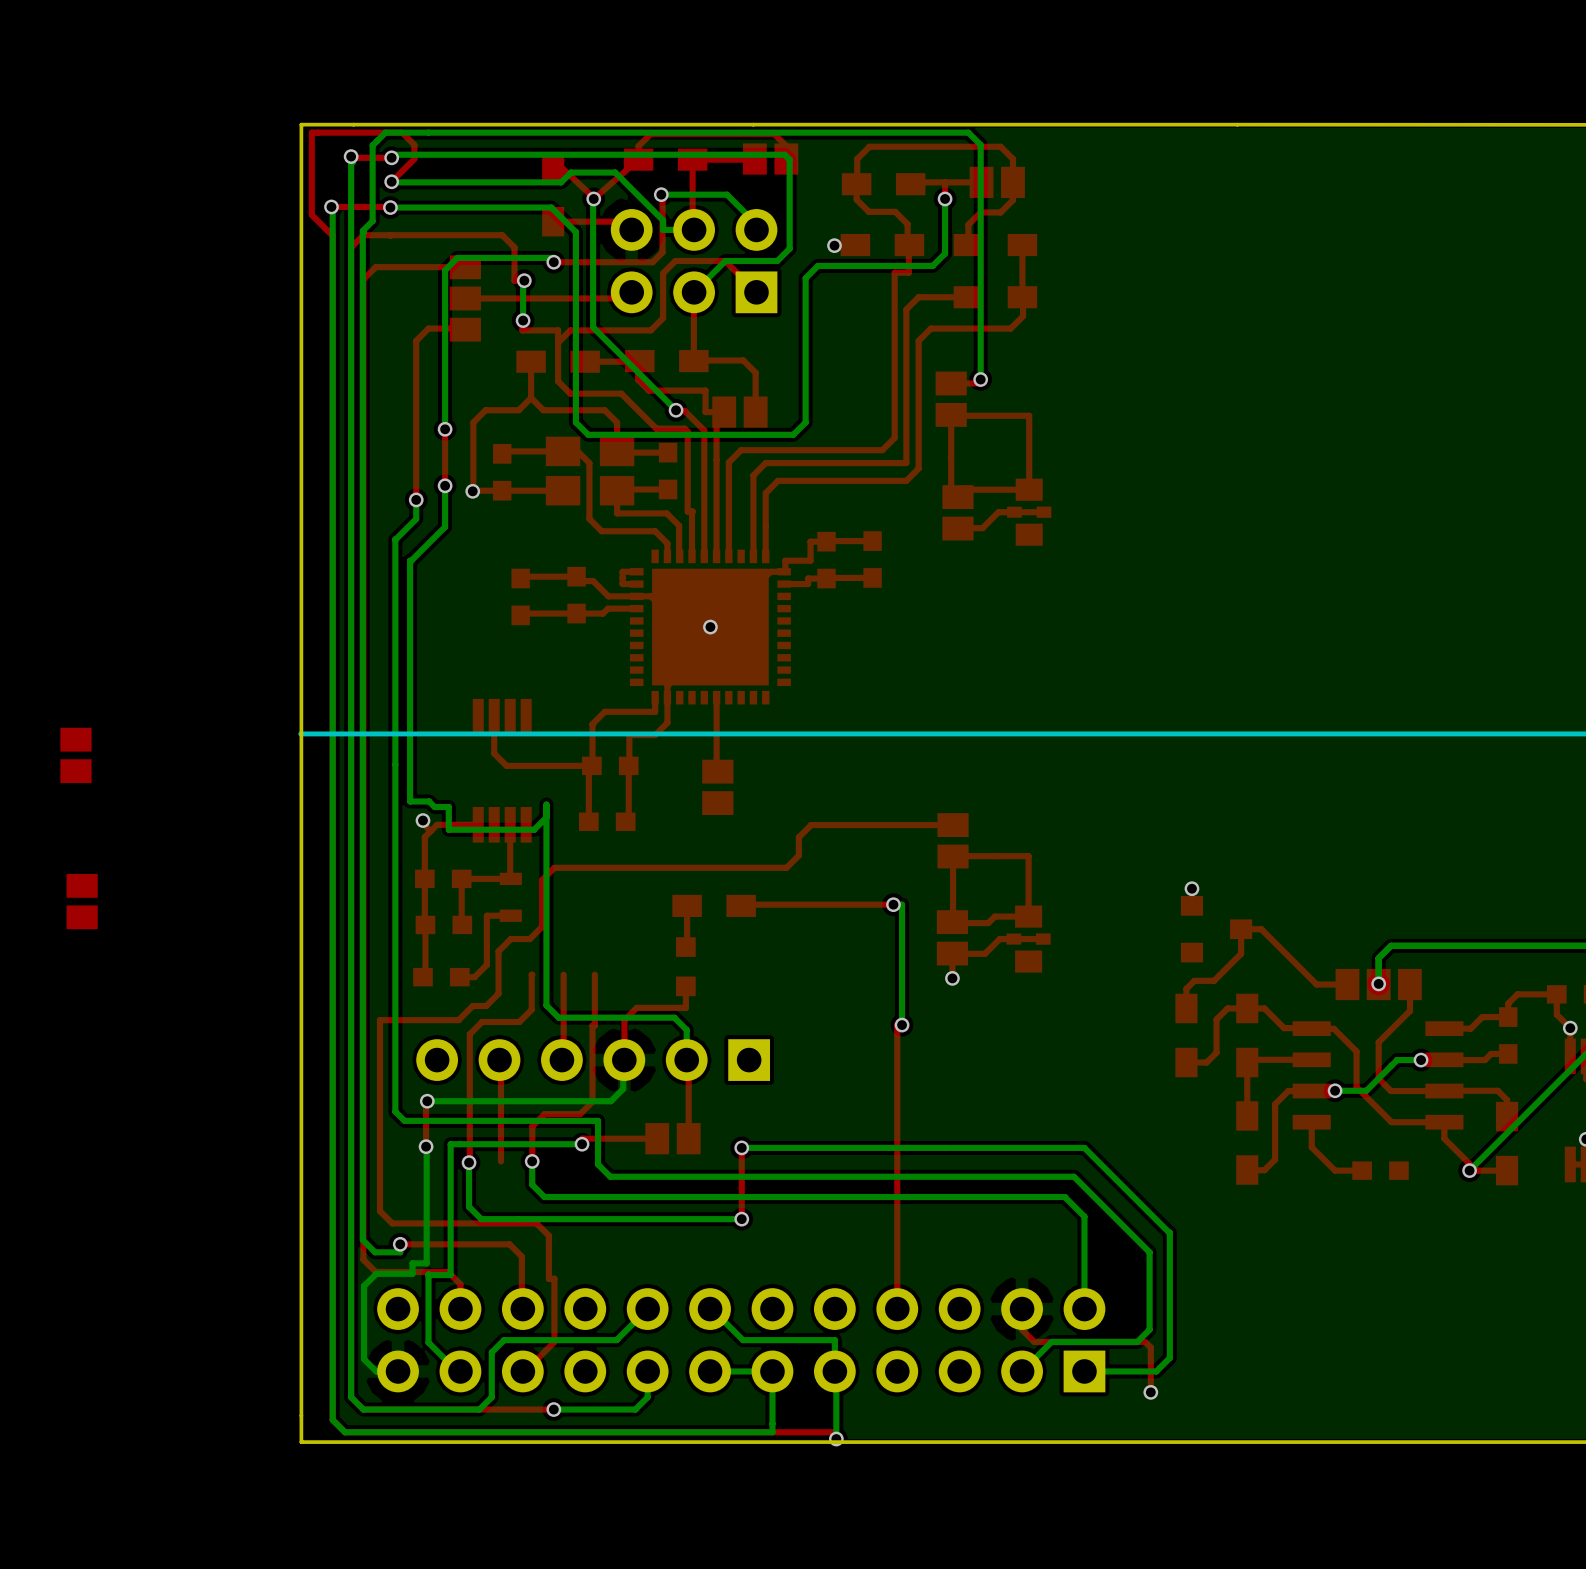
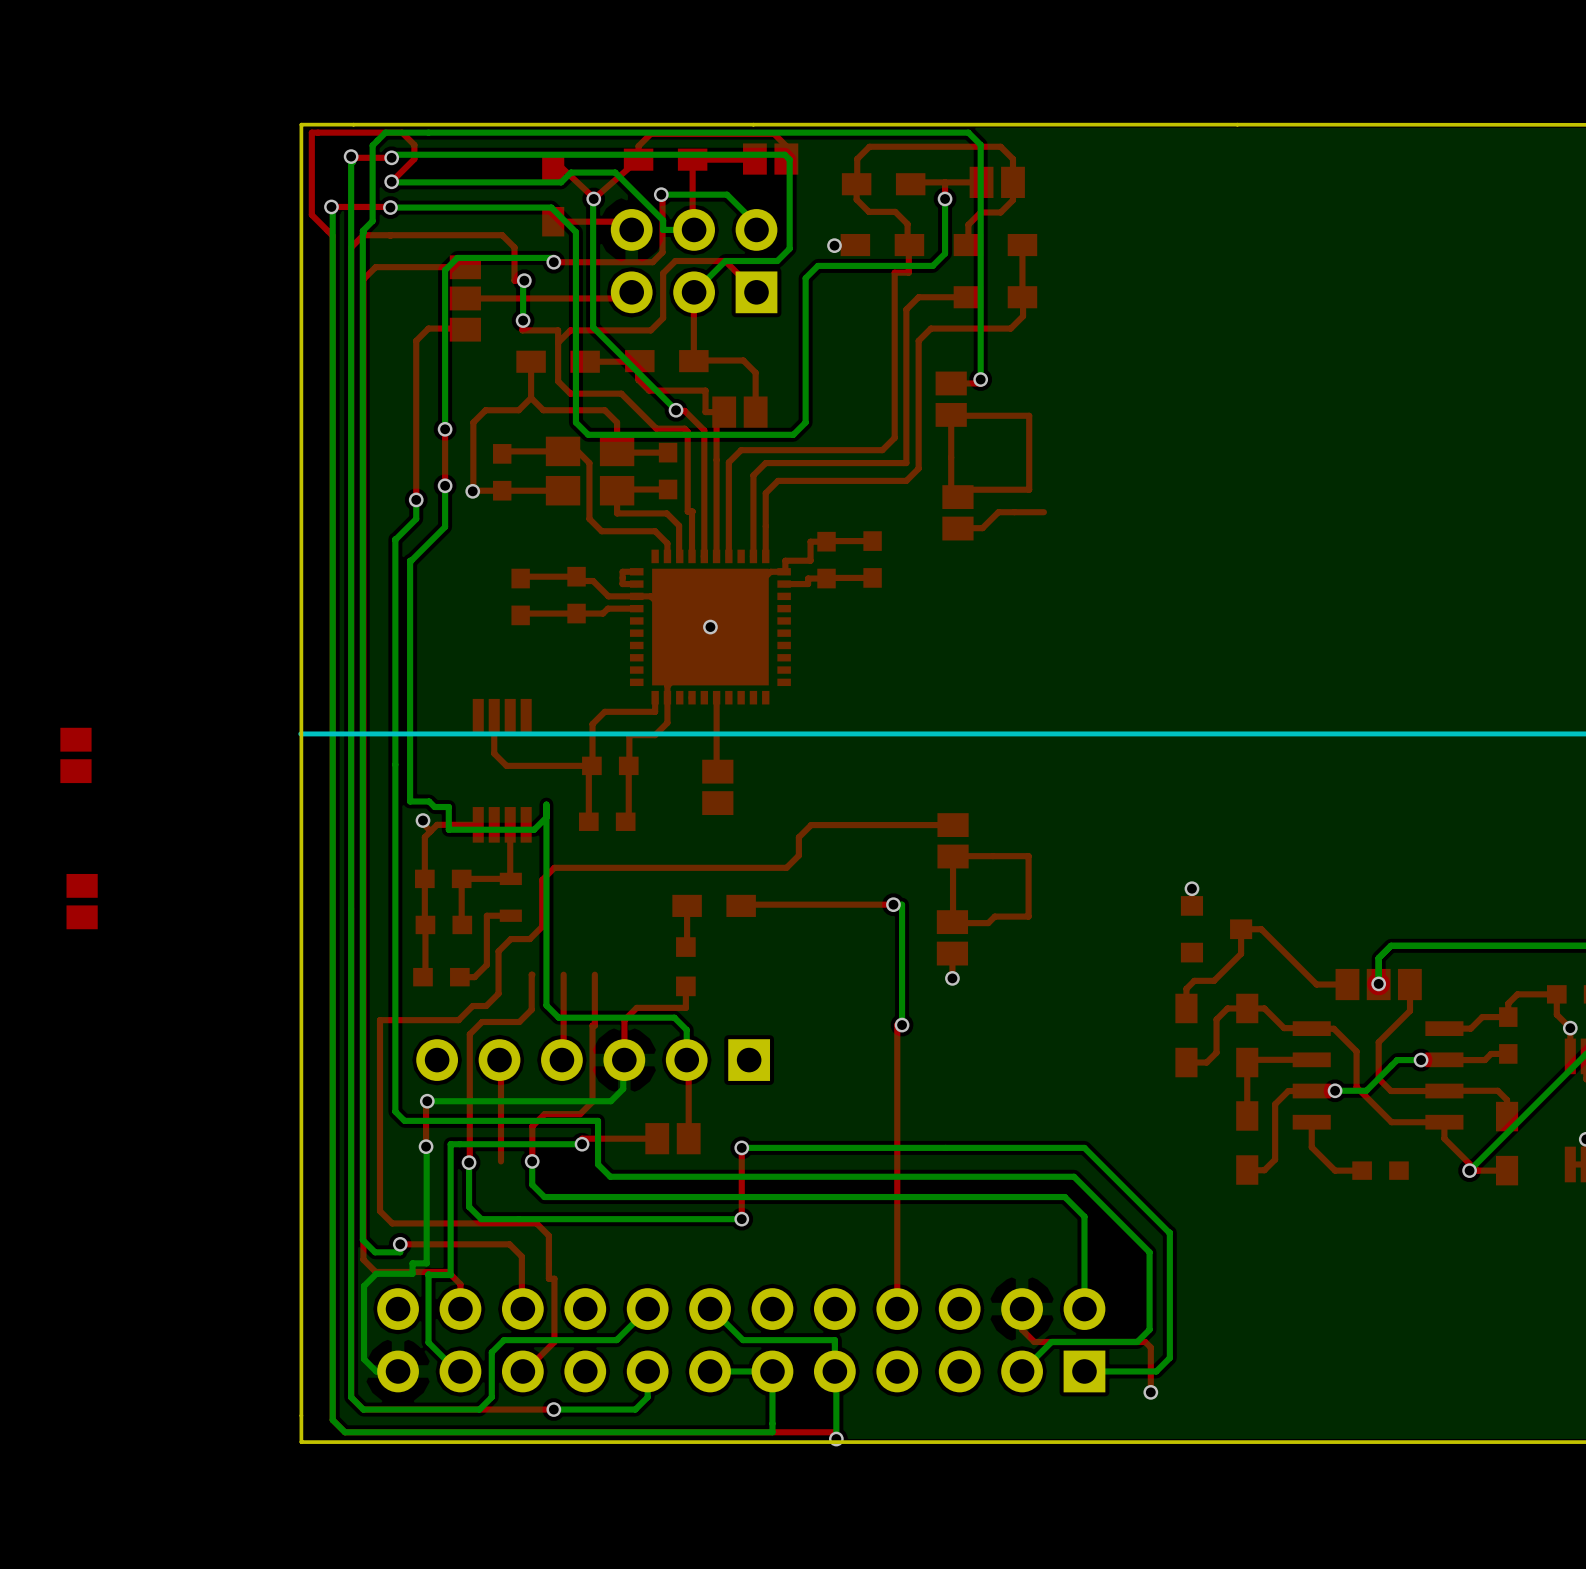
part: (1029, 512) -> none
part: (1028, 939) -> none
top track: (1043, 939) (999, 939) (984, 953) (952, 953) -> none

